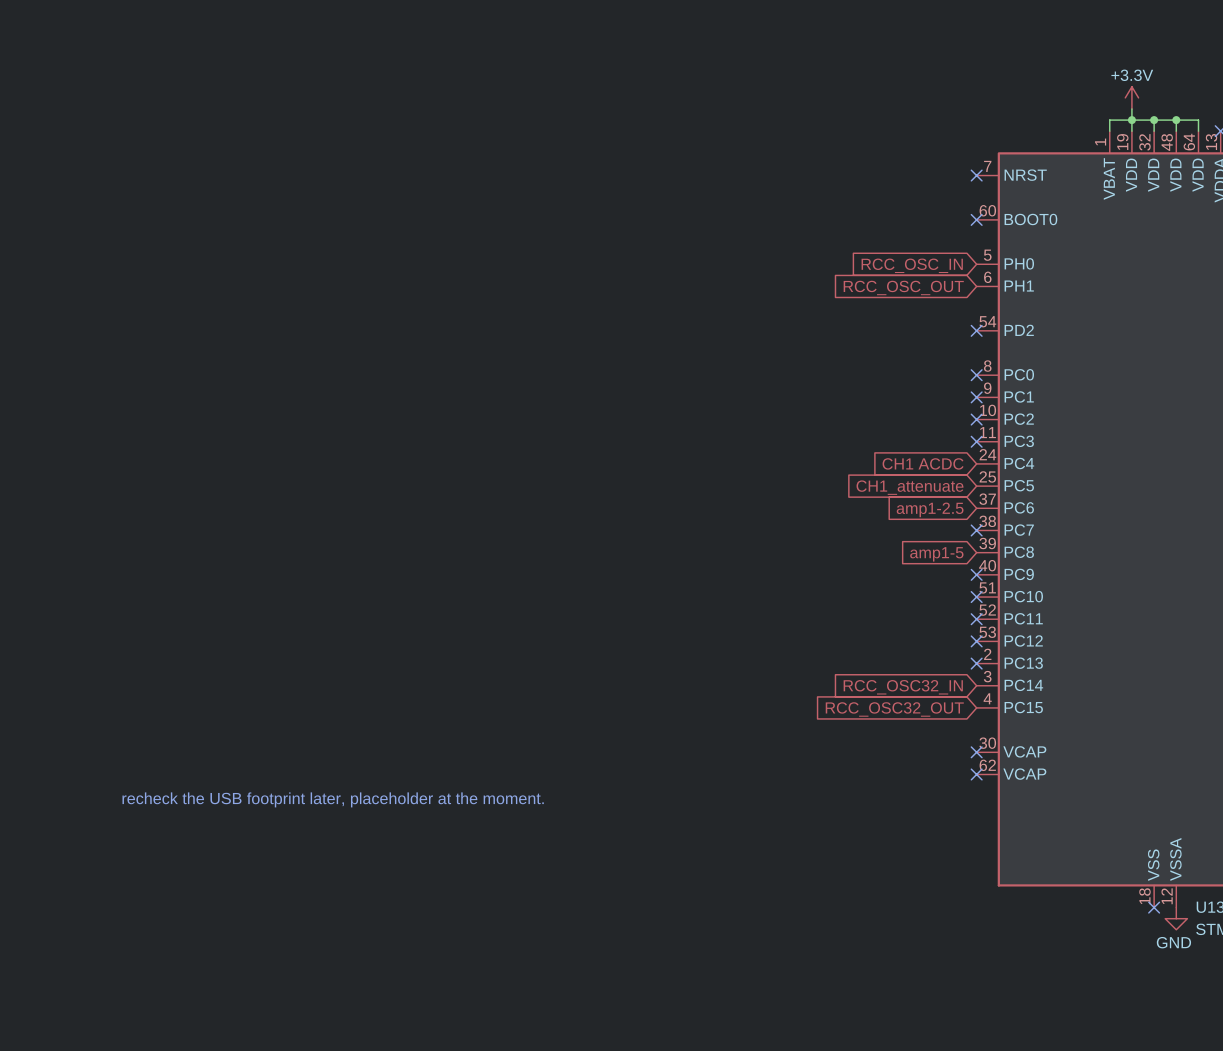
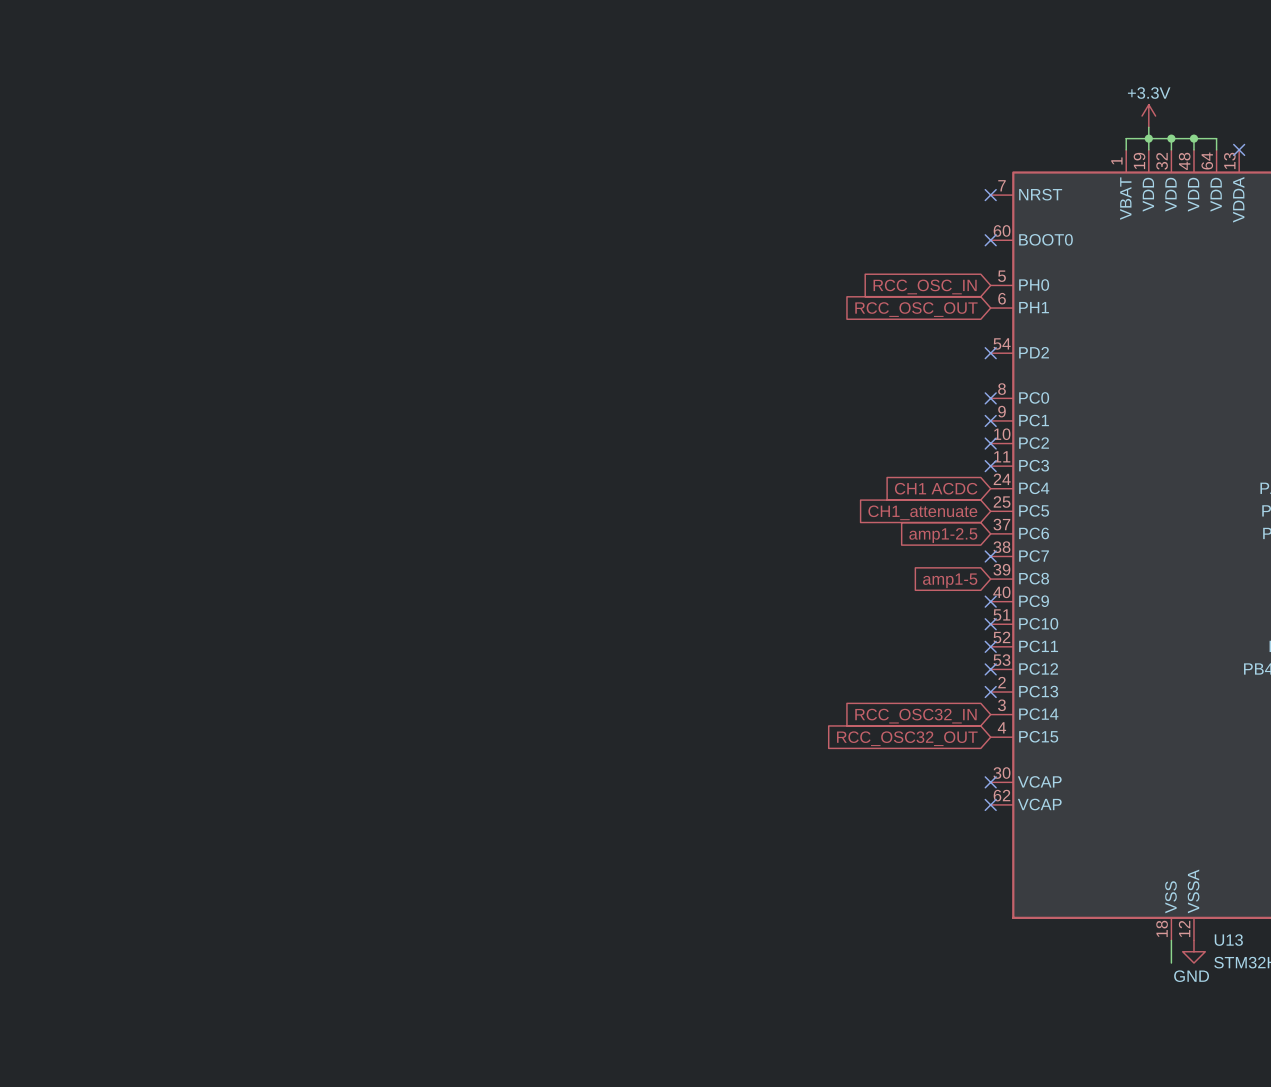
text: recheck the USB footprint later, placeholder at the moment. (333, 799) -> none
wire: none -> (1171, 940) (1171, 963)
no-connect mark: (1154, 907) -> none

